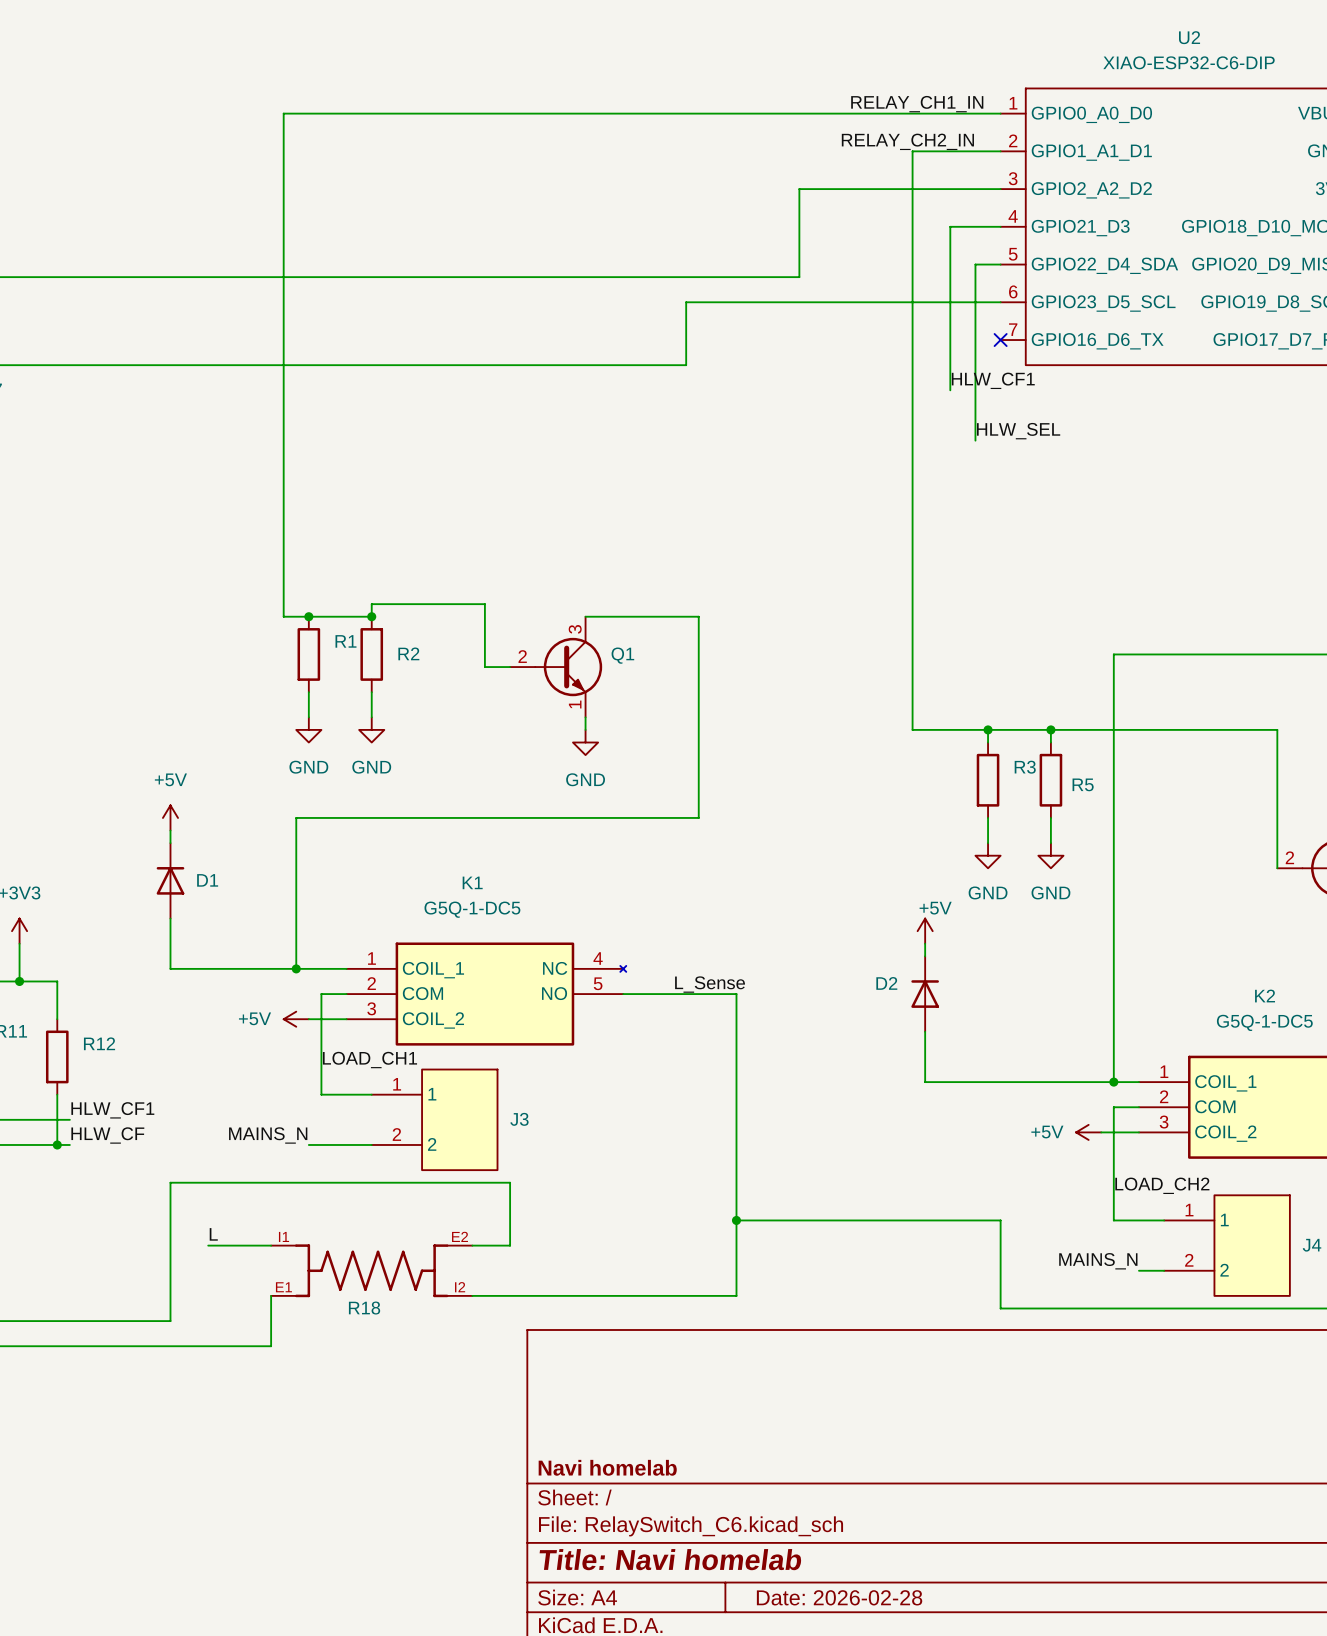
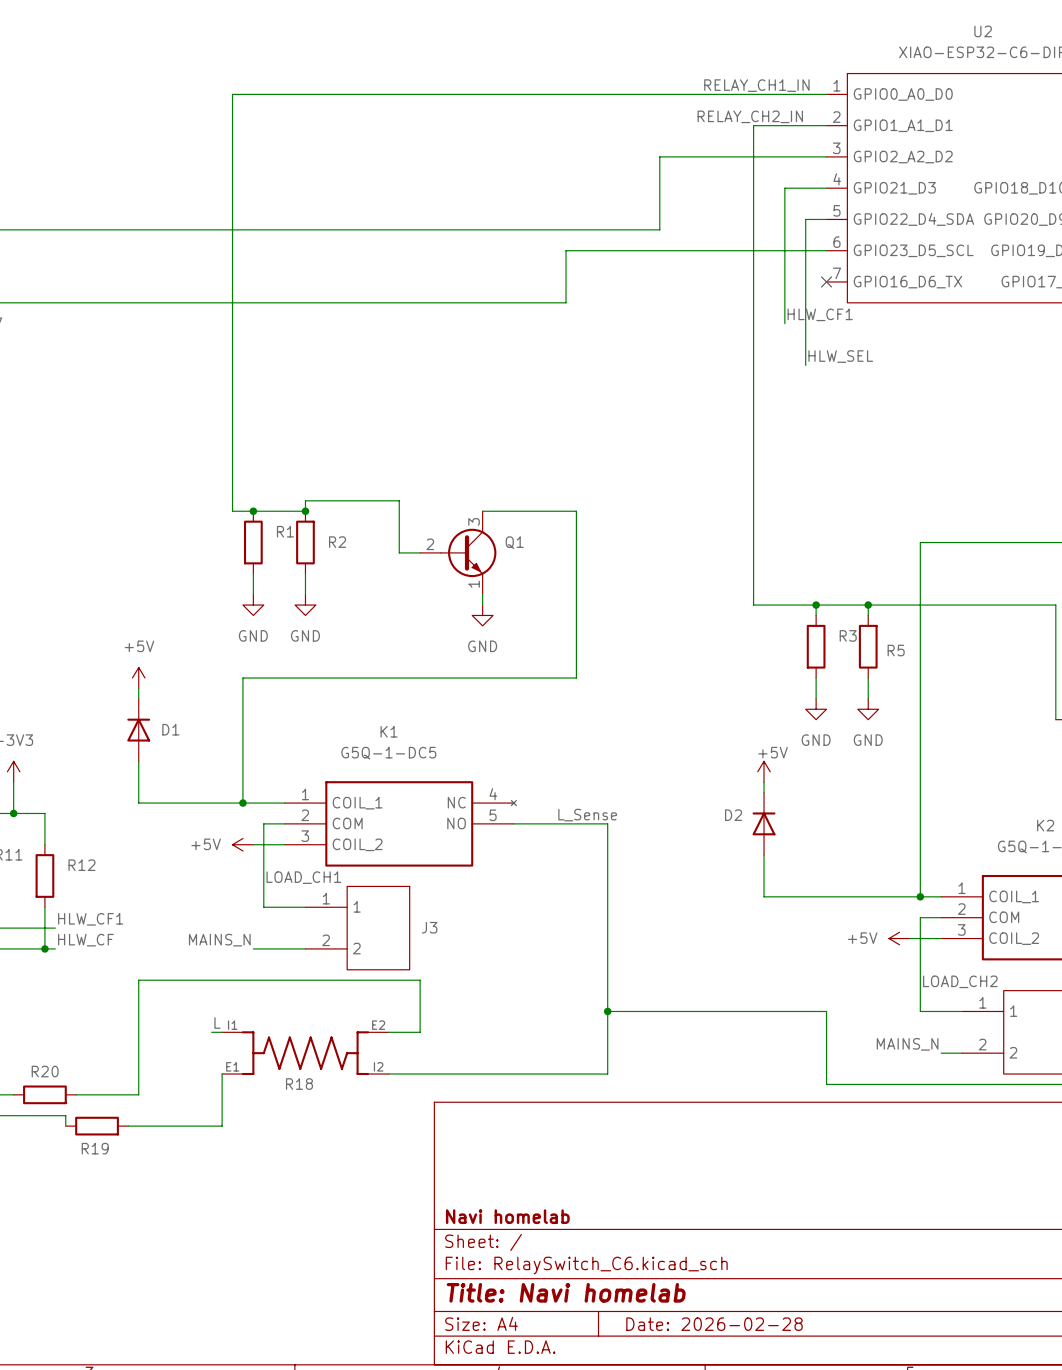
label position: L (213, 1234) -> L (217, 1023)
wire: (208, 1245) (258, 1245) -> none
wire: (19, 1321) (95, 1321) -> none
R20: none -> (44, 1094)
wire: (82, 1346) (271, 1346) -> (128, 1126) (222, 1126) (222, 1115)
wire: none -> (65, 1115) (65, 1126)
R19: none -> (97, 1126)

